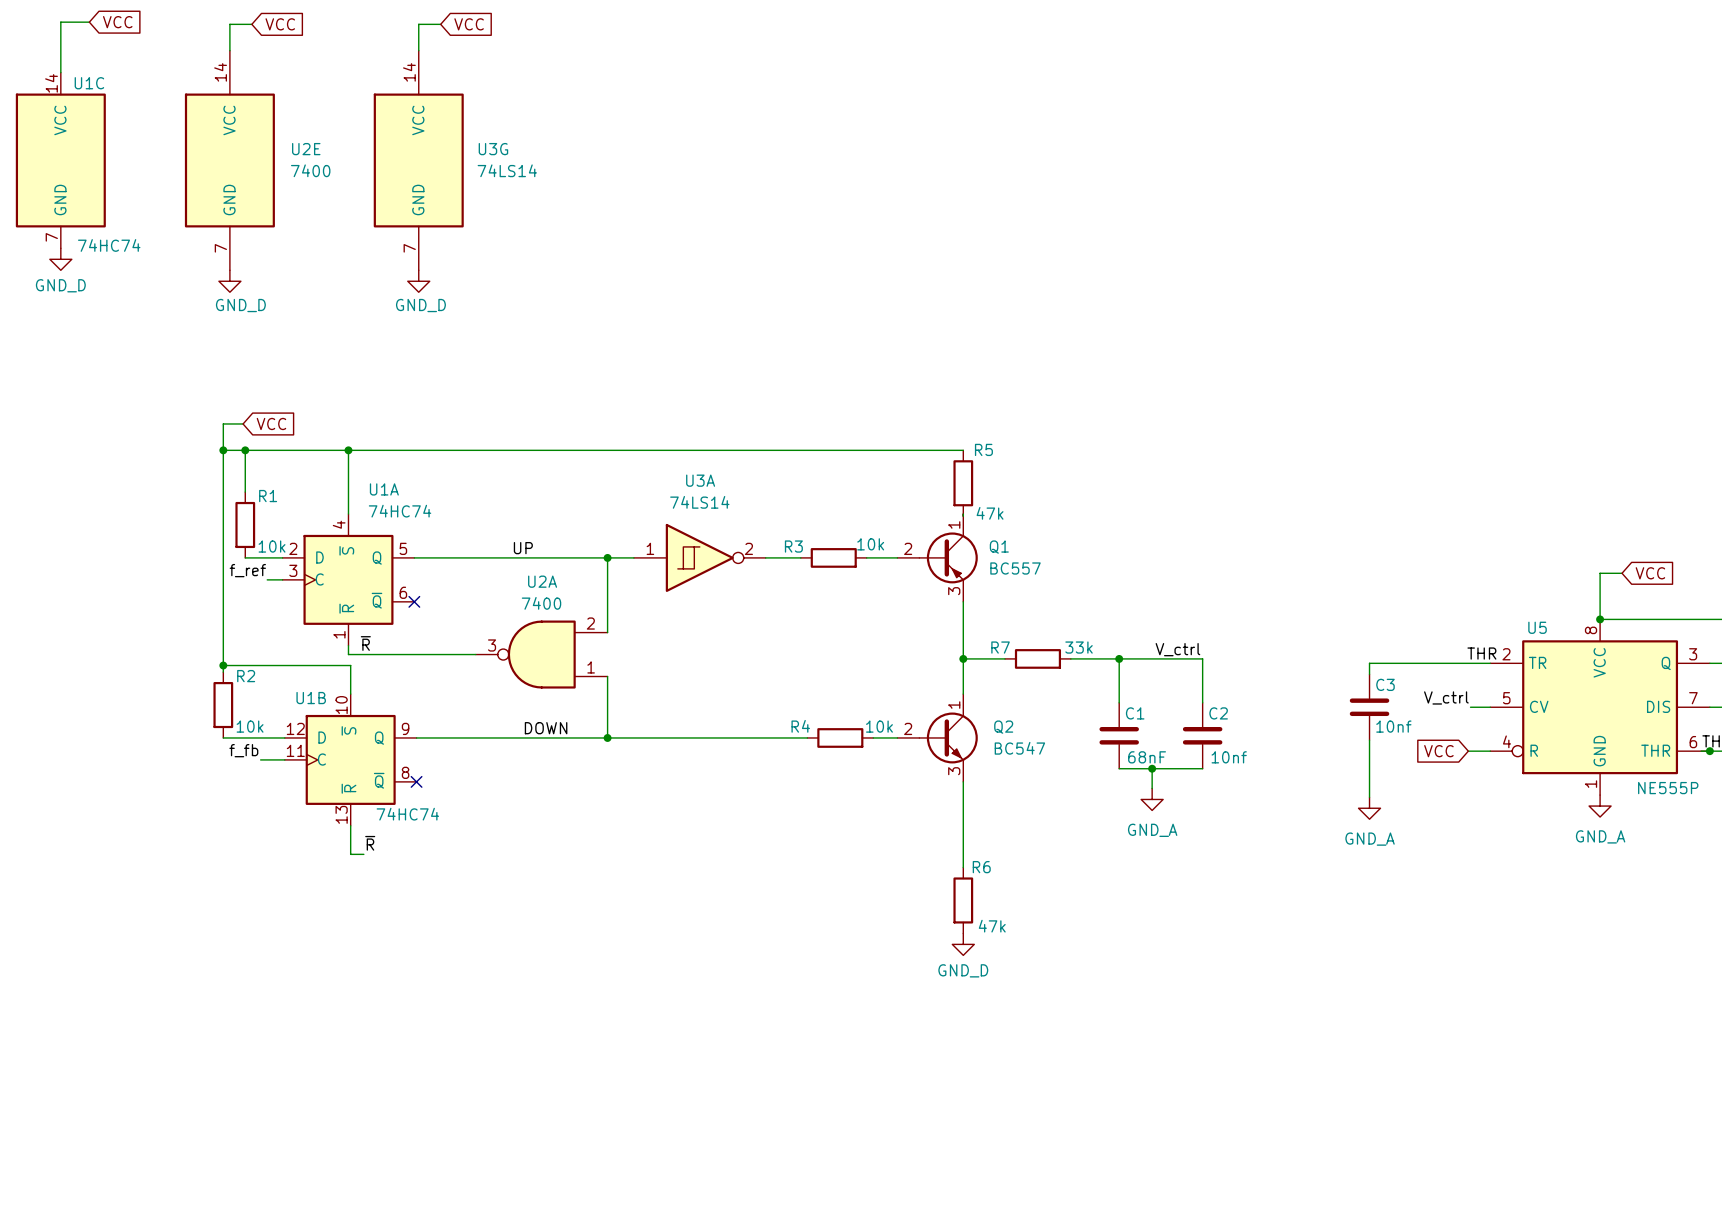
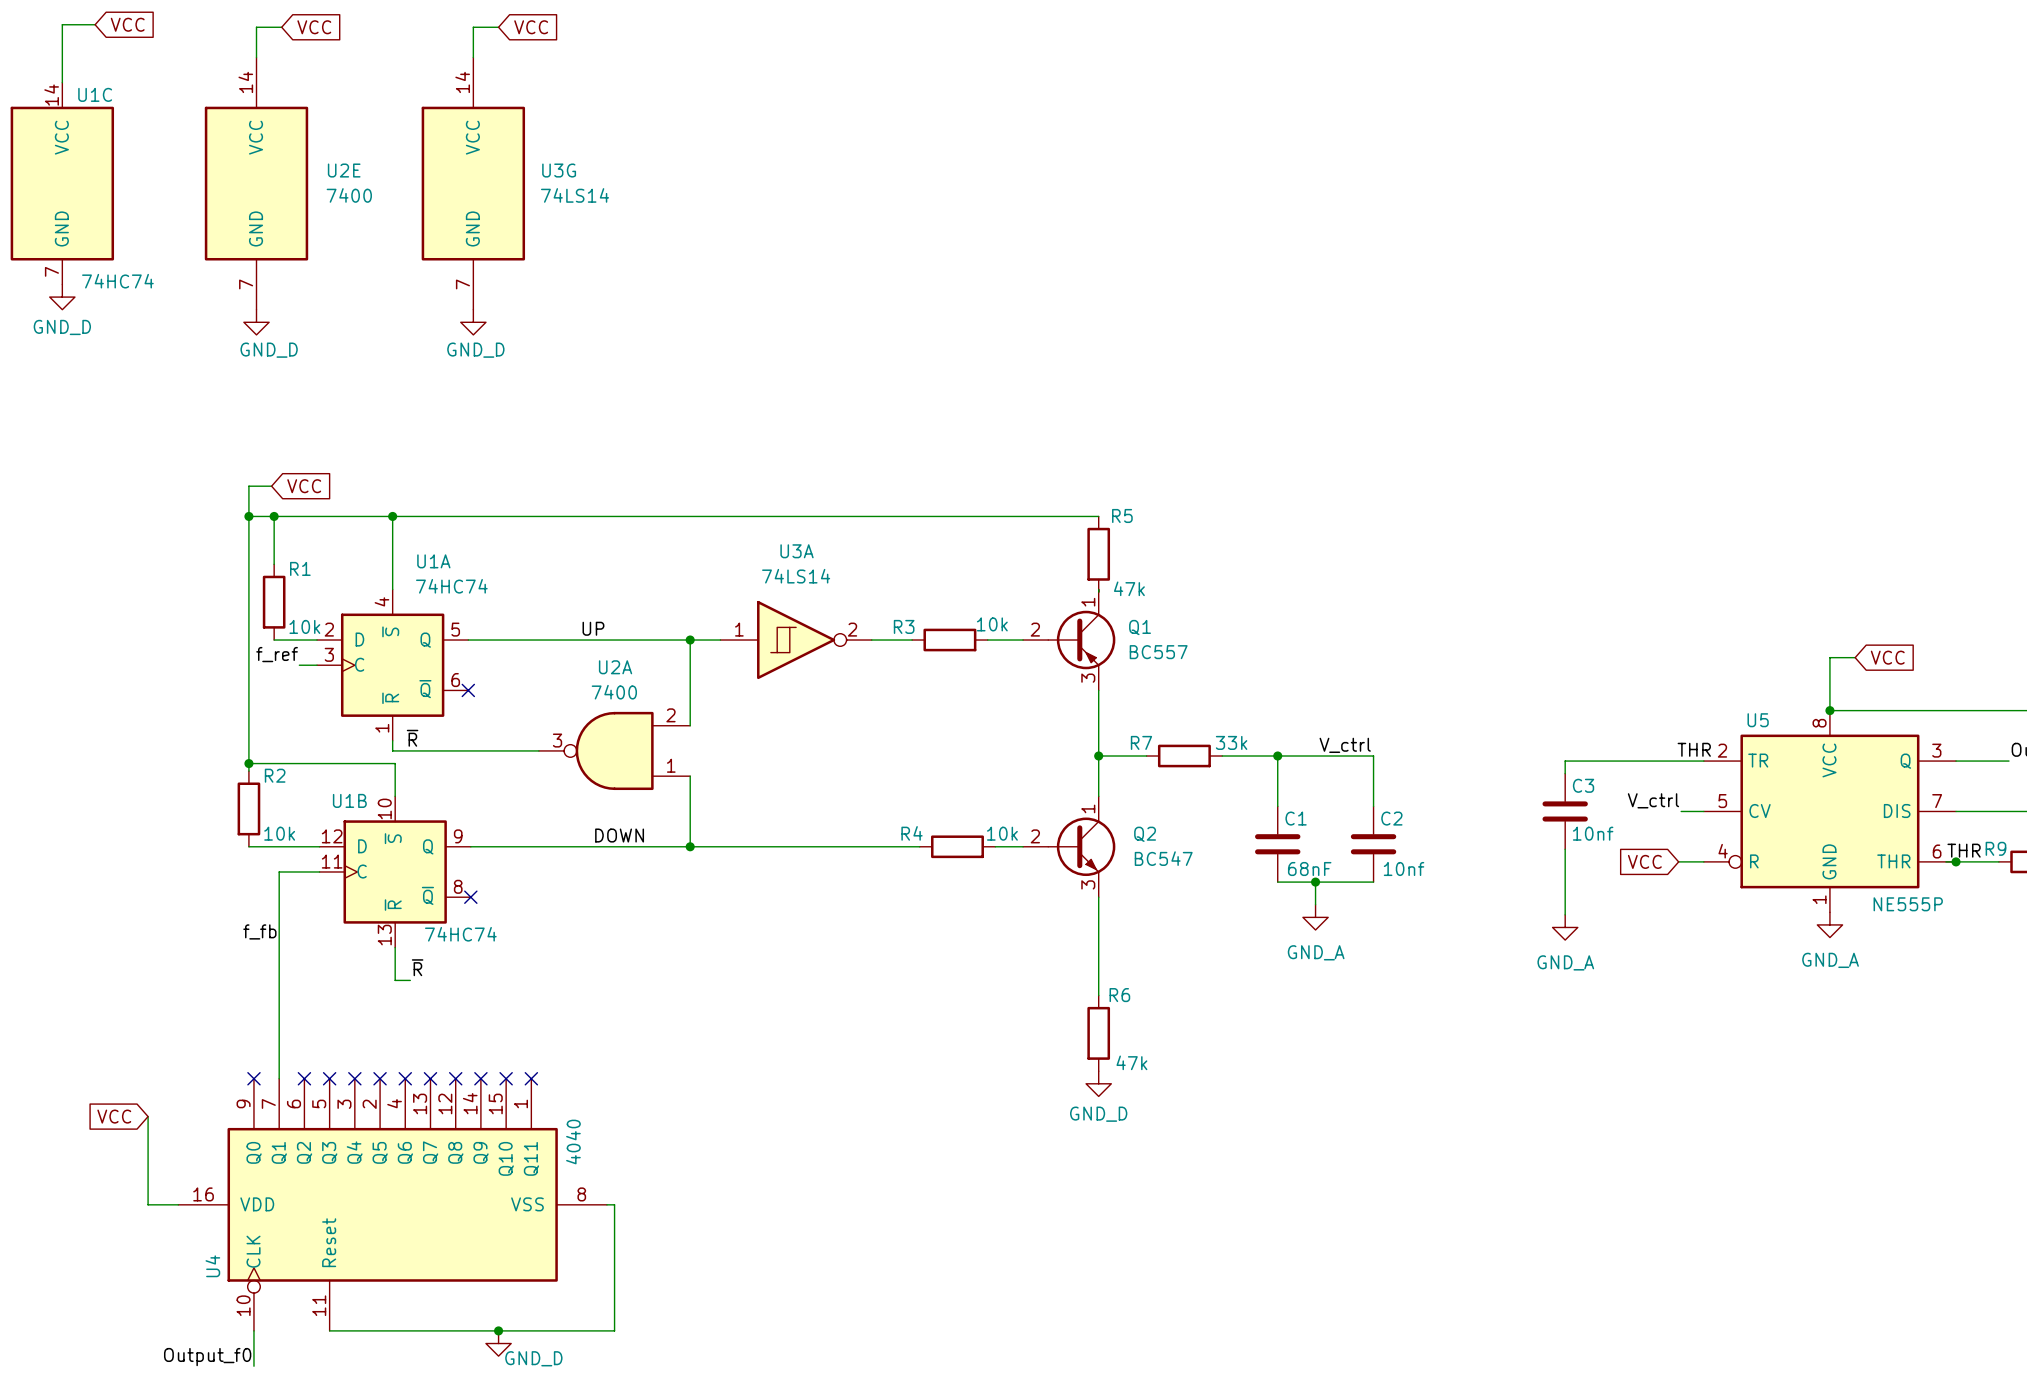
label position: f_fb (243, 750) -> f_fb (259, 931)
wire: none -> (291, 871) (279, 871) (279, 1078)
no-connect mark: none -> (253, 1078)
no-connect mark: none -> (304, 1078)
no-connect mark: none -> (329, 1078)
no-connect mark: none -> (354, 1078)
no-connect mark: none -> (380, 1078)
no-connect mark: none -> (405, 1078)
no-connect mark: none -> (430, 1078)
no-connect mark: none -> (455, 1078)
no-connect mark: none -> (480, 1078)
no-connect mark: none -> (506, 1078)
no-connect mark: none -> (531, 1078)
global label: none -> VCC (114, 1116)
wire: none -> (148, 1116) (148, 1204) (178, 1204)
U4: none -> 4040 (392, 1204)
wire: none -> (606, 1204) (614, 1204) (614, 1330) (329, 1330)
wire: none -> (253, 1330) (253, 1366)
junction: none -> (498, 1330)
power symbol: none -> GND_D (498, 1343)
label: none -> Output_f0 (207, 1357)

